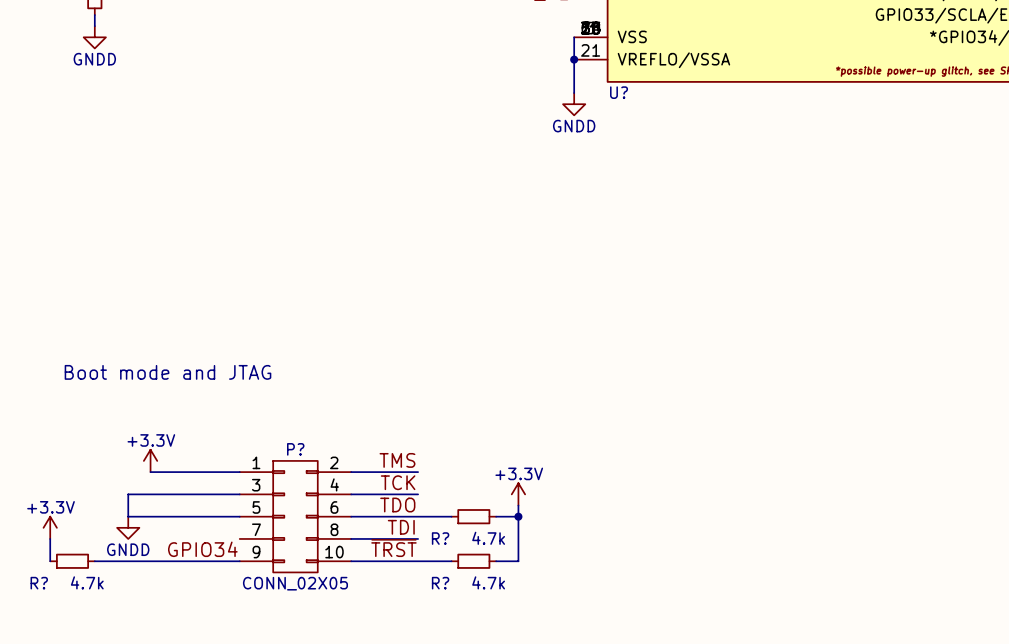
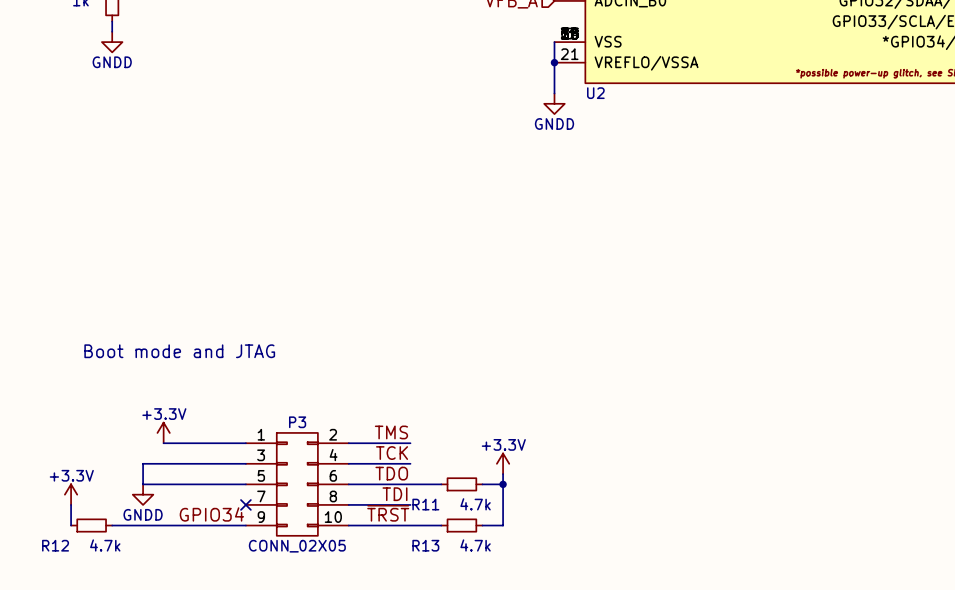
U? name: U? (619, 92) -> U2 (595, 93)
P? name: P? (295, 449) -> P3 (297, 422)
no-connect mark: none -> (245, 504)
R? name: R? (440, 538) -> R11 (425, 504)
R? name: R? (39, 583) -> R12 (55, 545)
R? name: R? (440, 583) -> R13 (425, 545)

